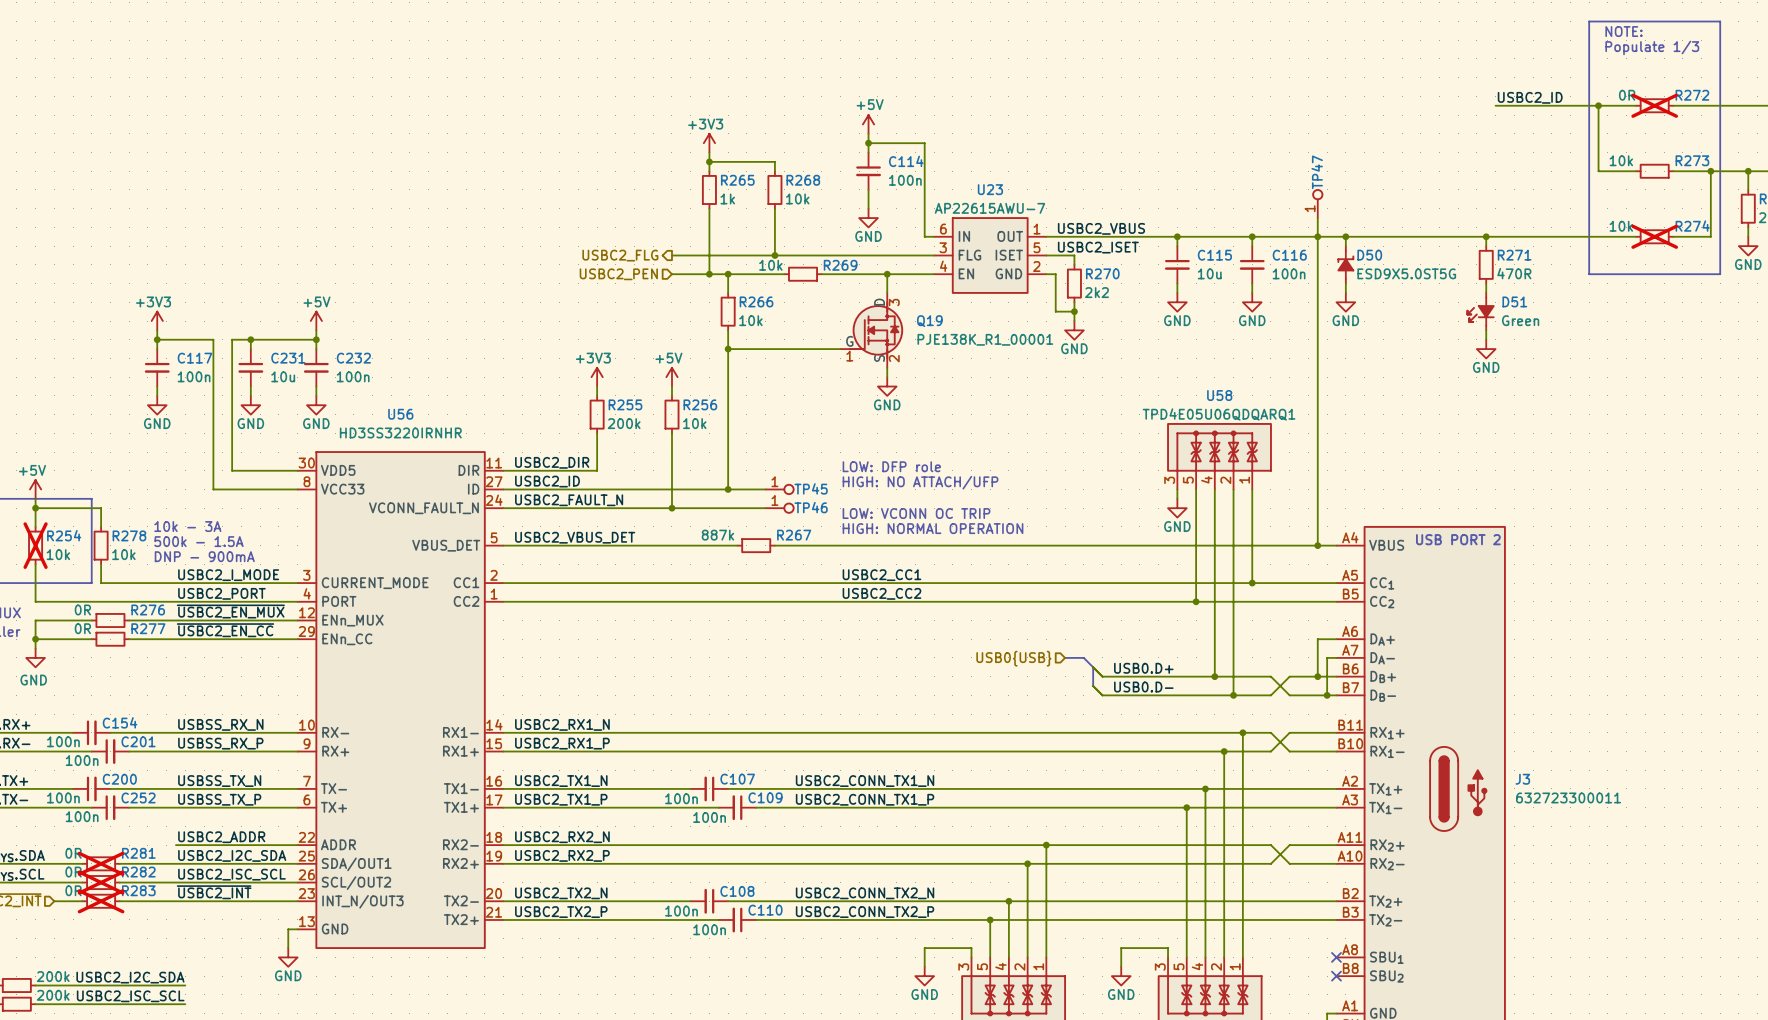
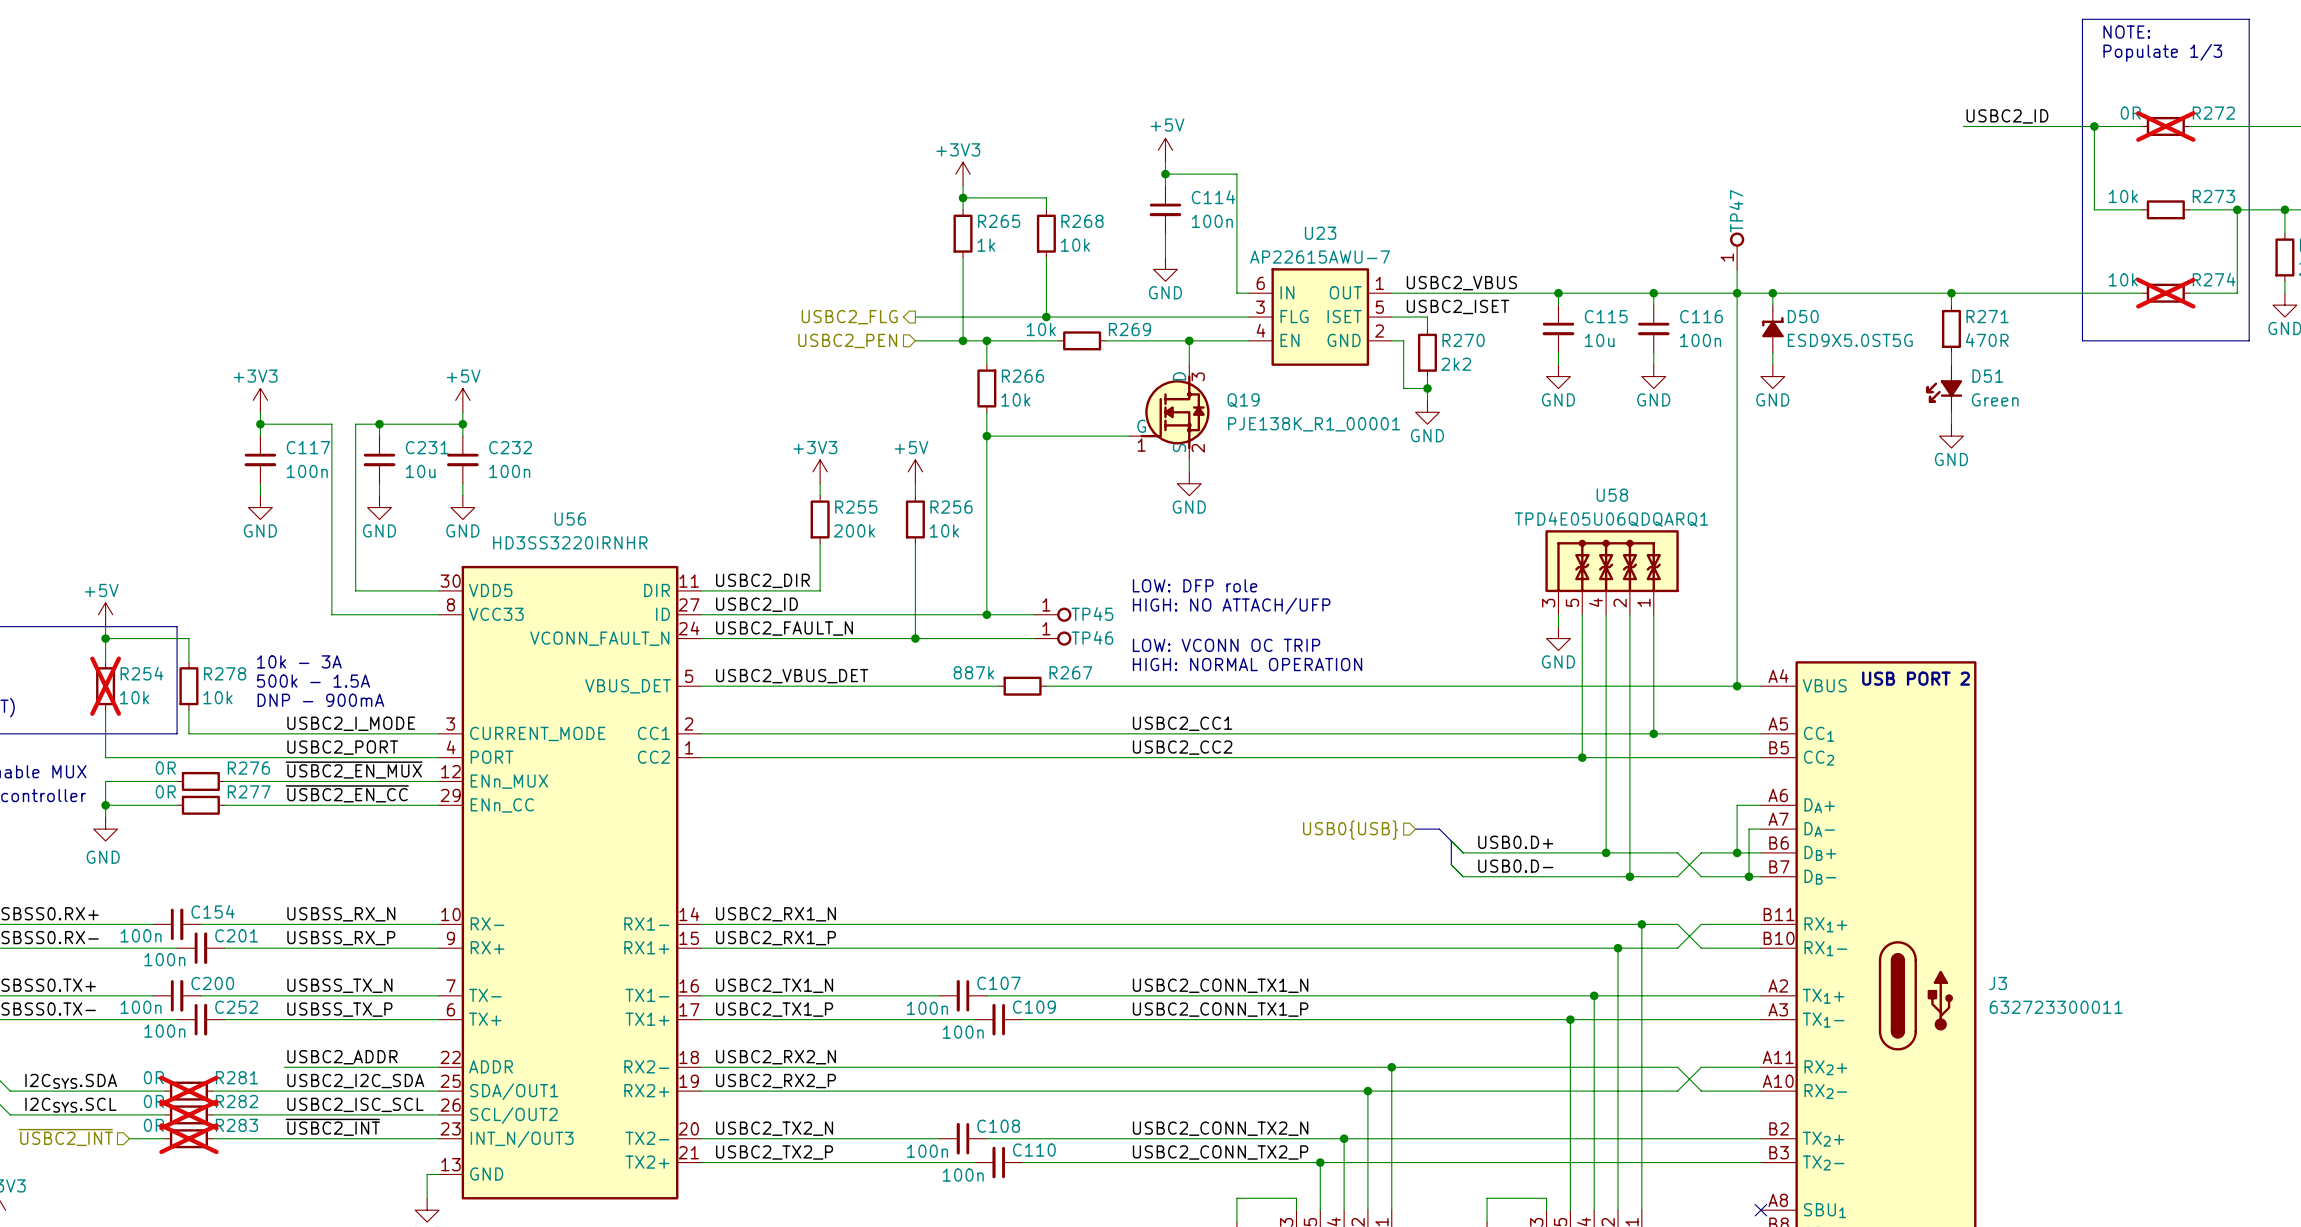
label position: USBC2_CONN_TX1_N (865, 781) -> USBC2_CONN_TX1_N (1220, 985)
label position: USBC2_CONN_TX1_P (865, 799) -> USBC2_CONN_TX1_P (1220, 1009)
label position: USBC2_CONN_TX2_N (865, 893) -> USBC2_CONN_TX2_N (1220, 1128)
label position: USBC2_CONN_TX2_P (865, 912) -> USBC2_CONN_TX2_P (1220, 1152)

